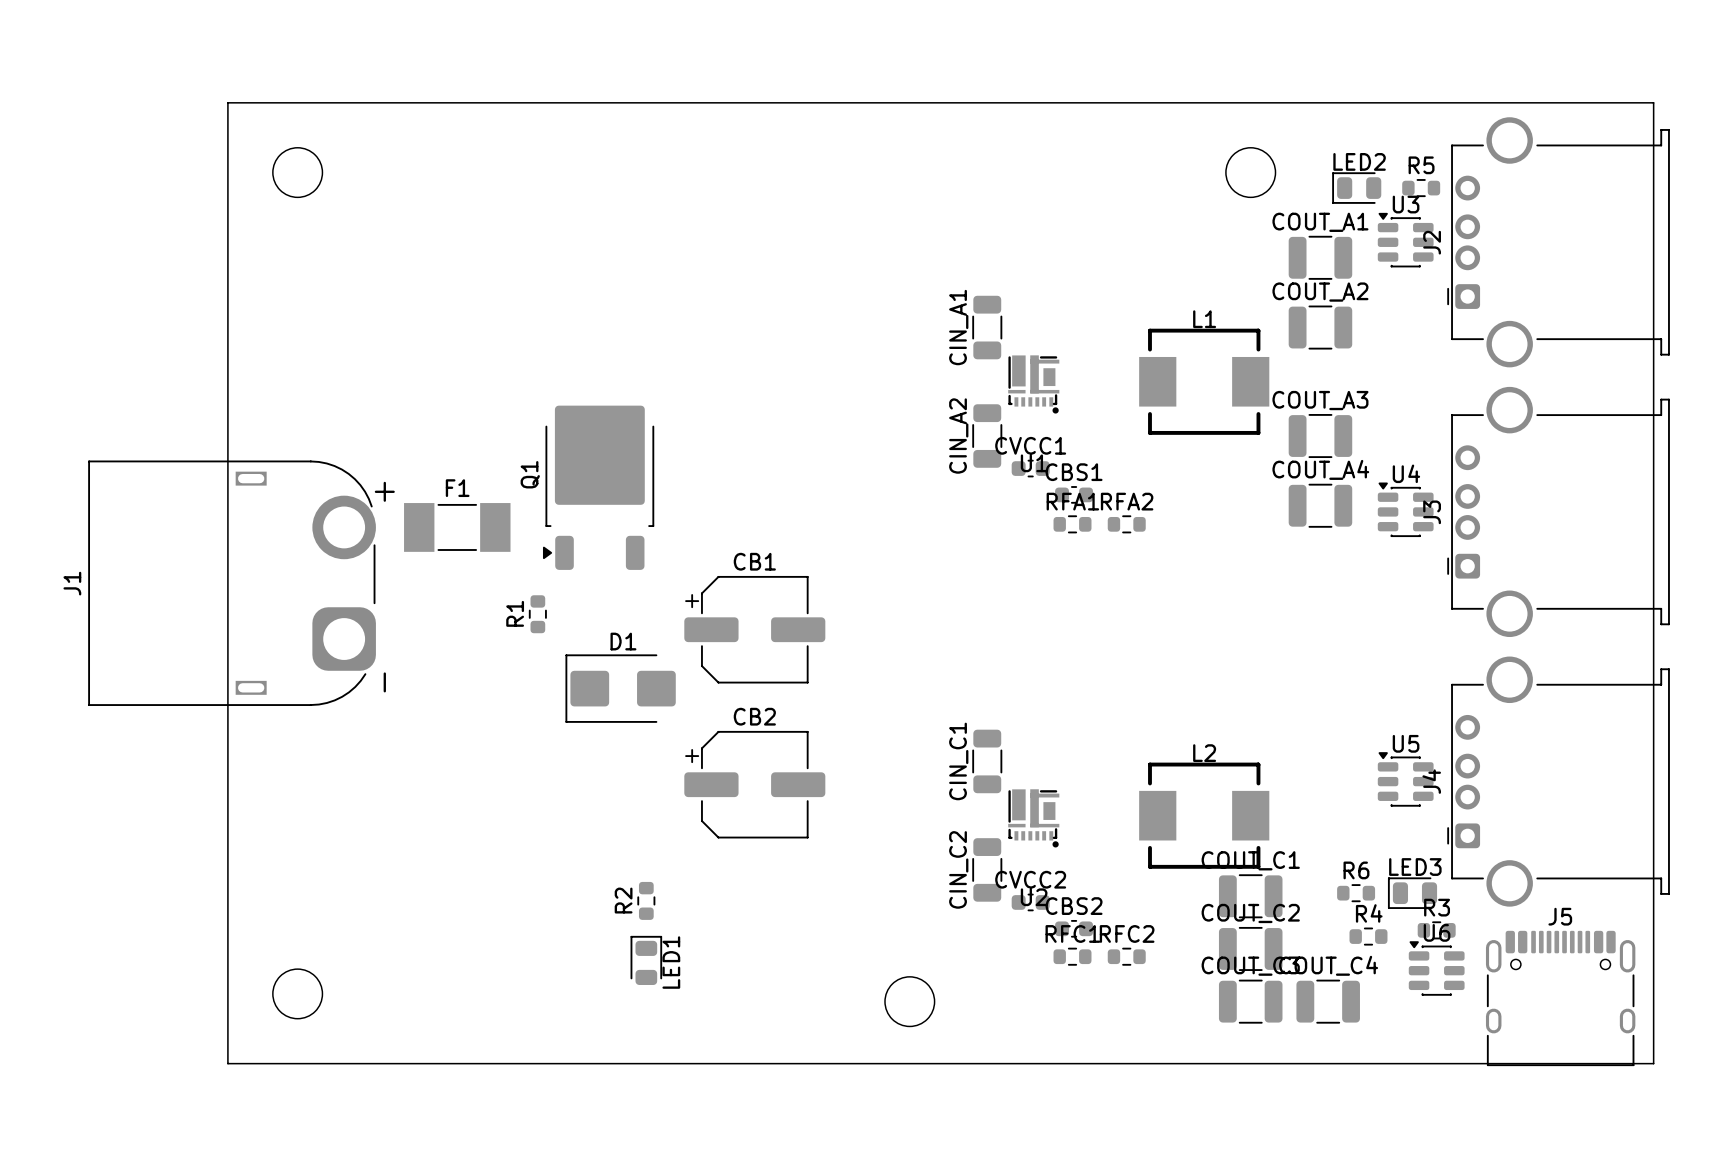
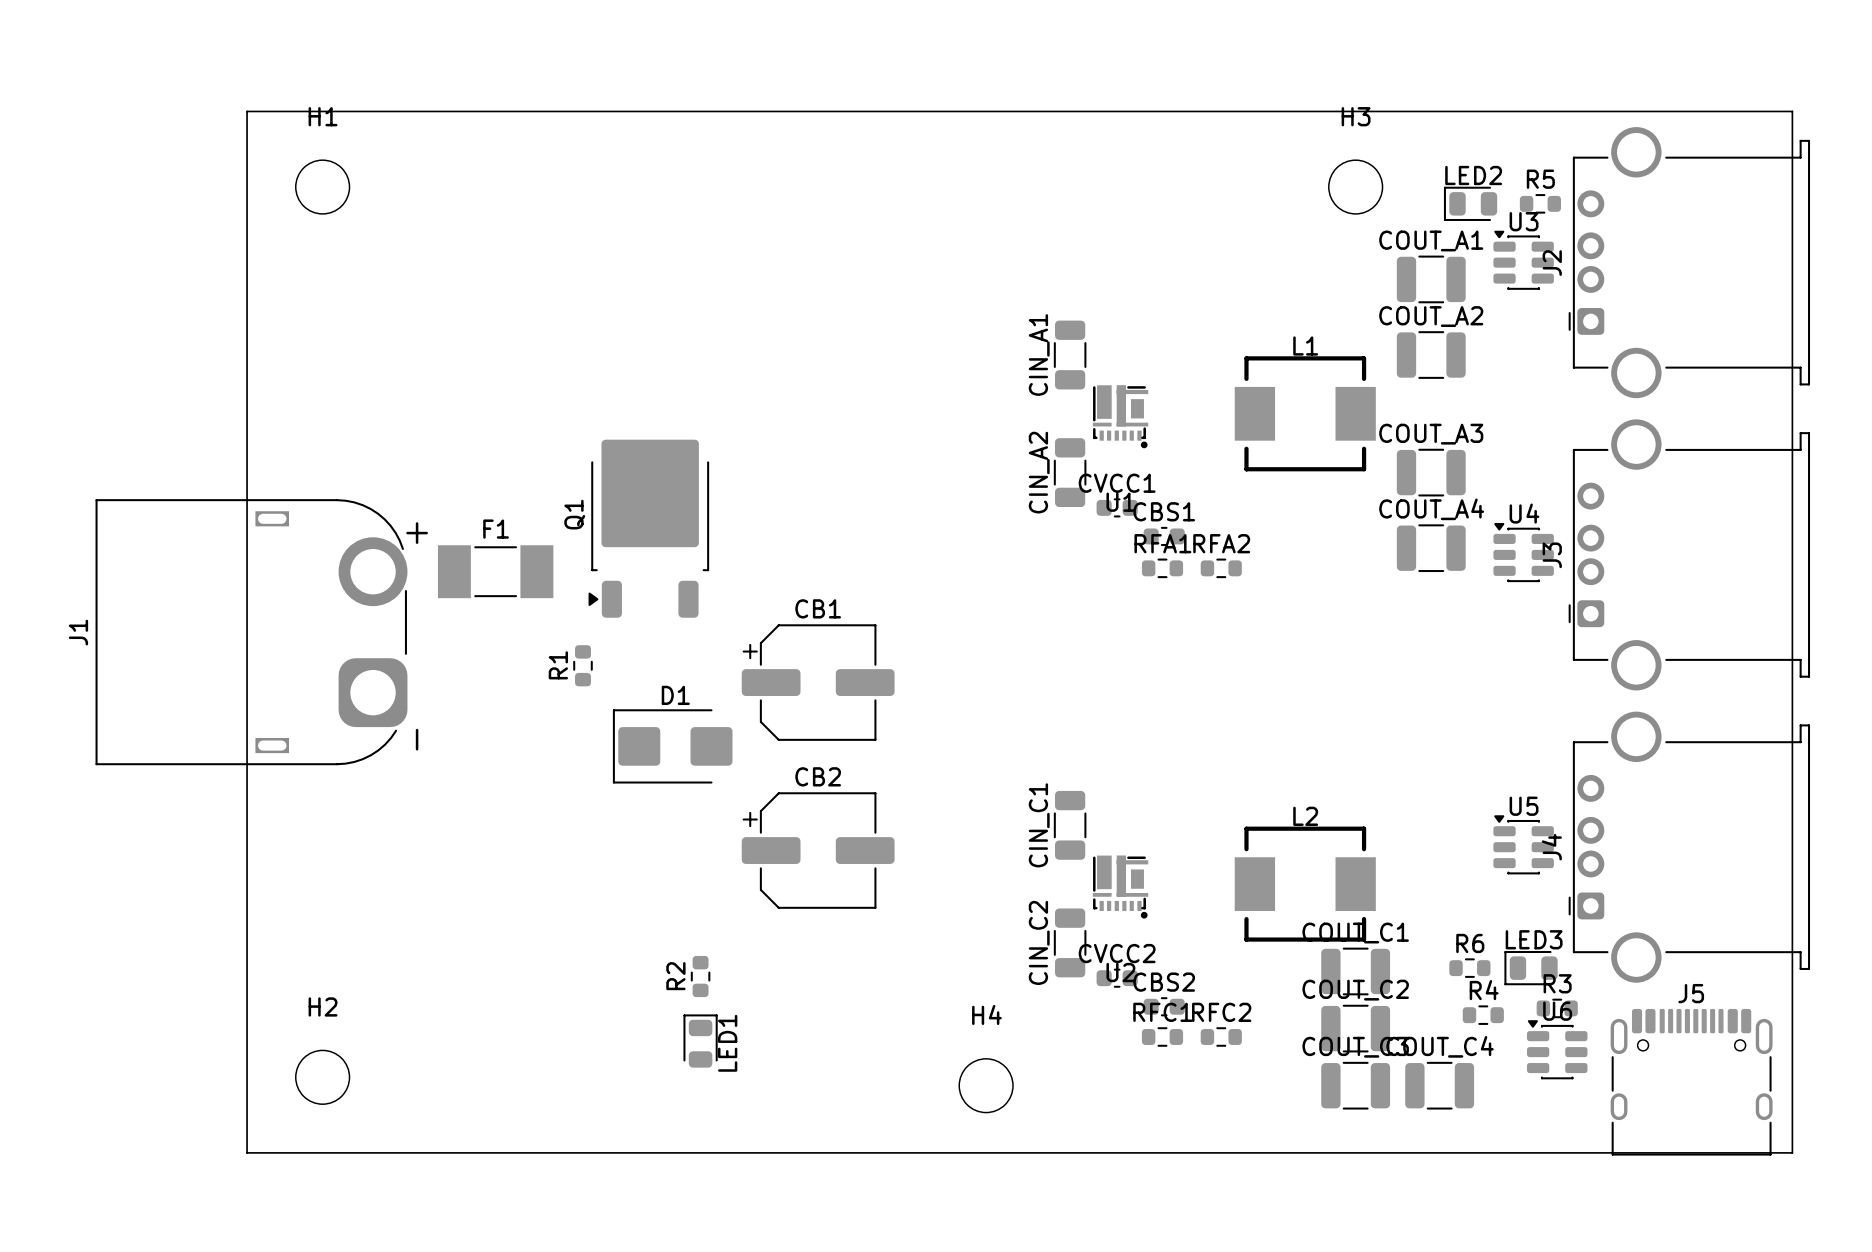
H1 name: none -> H1 (323, 116)
H3 name: none -> H3 (1356, 116)
H2 name: none -> H2 (323, 1006)
H4 name: none -> H4 (986, 1014)

